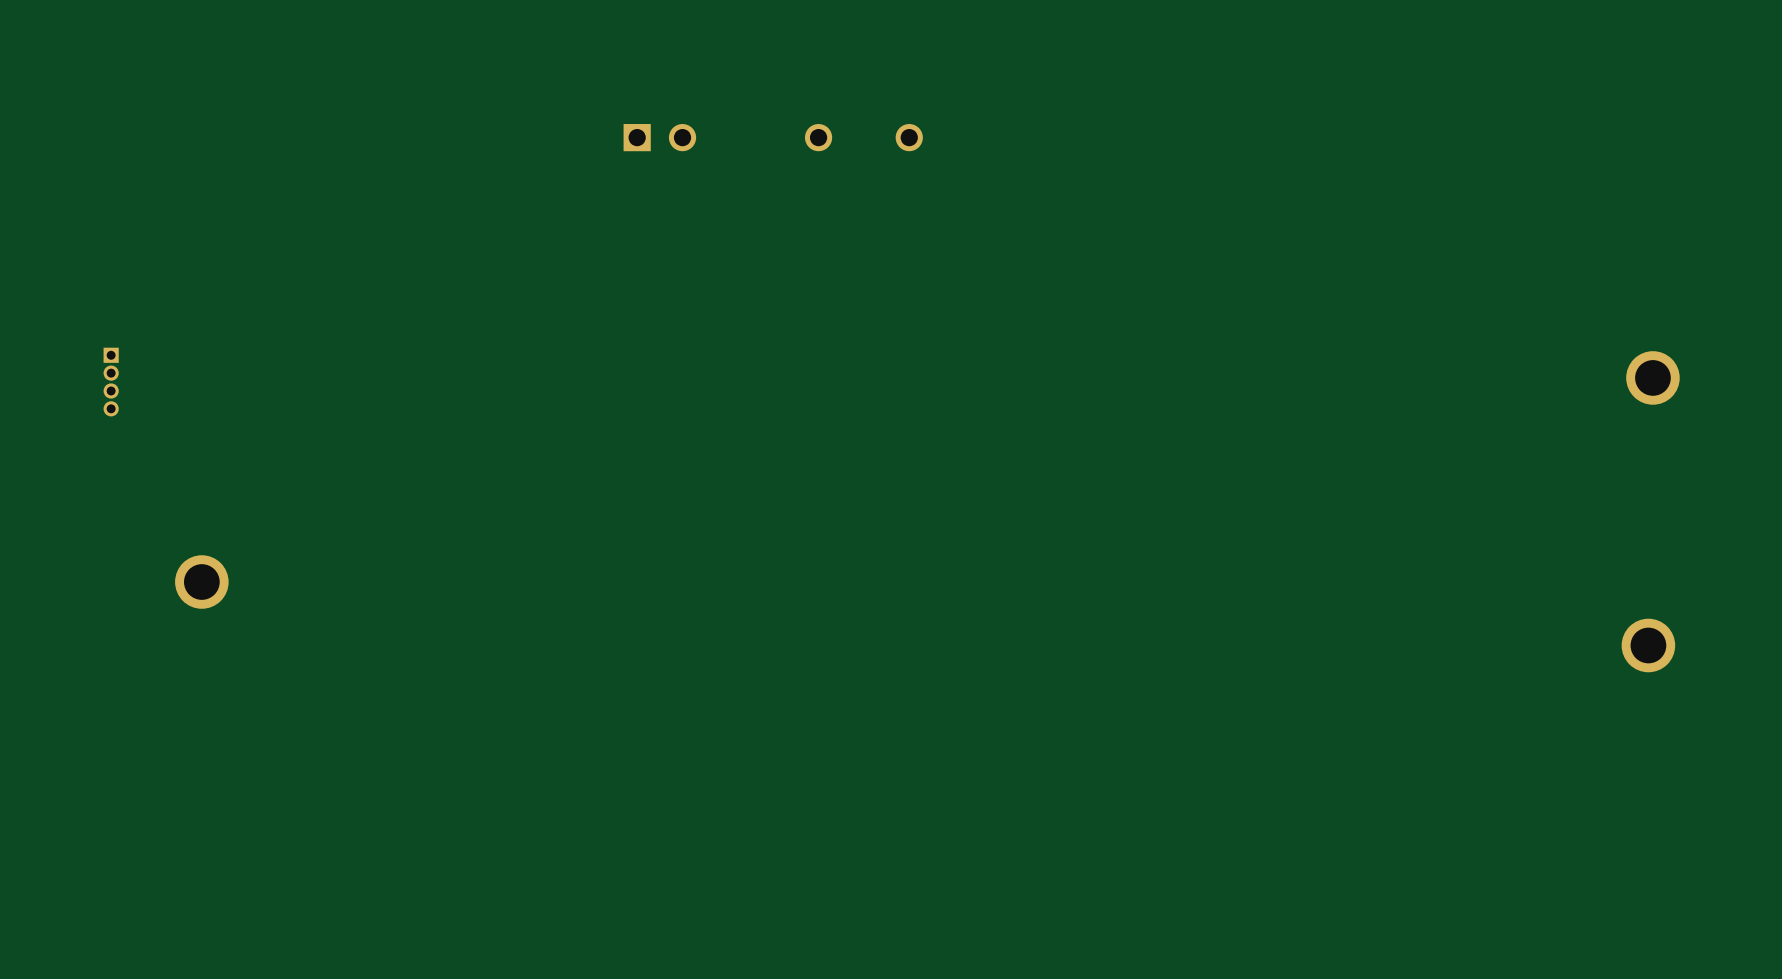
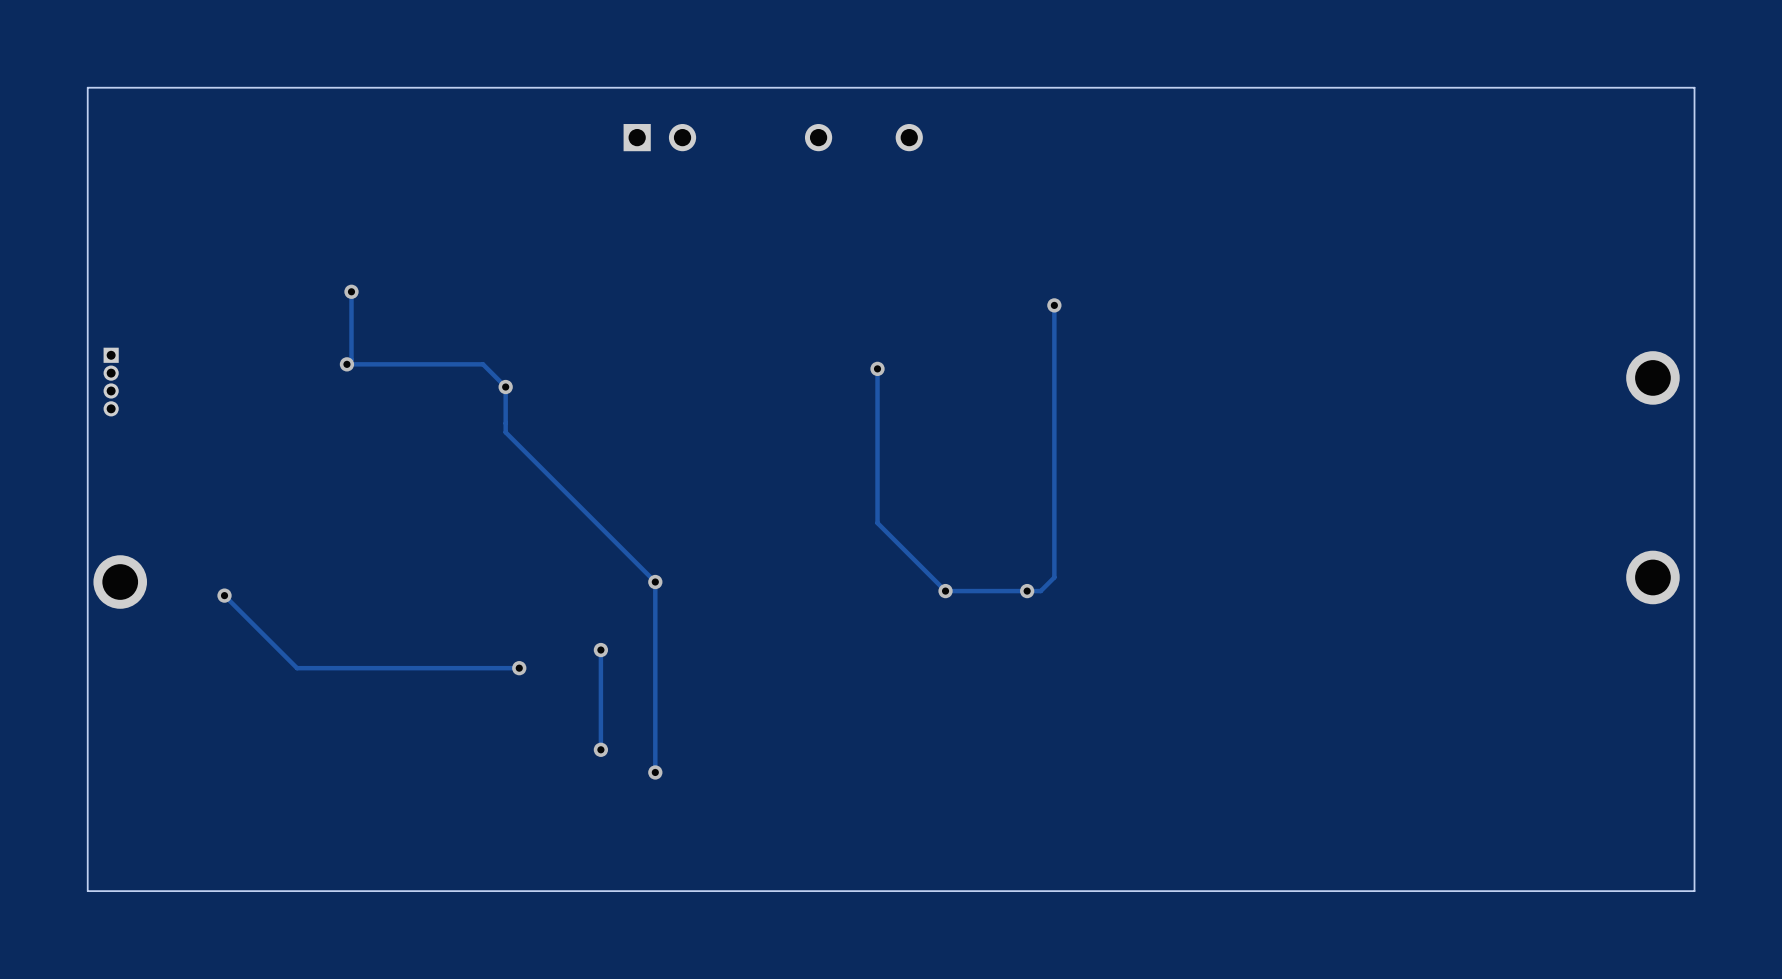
board edge: none -> (1694, 87) (87, 87) (87, 891) (1694, 891) (1694, 87)
track: none -> (351, 291) (351, 359) (346, 364) (483, 364) (505, 387) (505, 432) (655, 582) (655, 772)
via: none -> (351, 291)
track: none -> (1054, 305) (1054, 577) (1040, 591) (945, 591) (877, 523) (877, 368)
via: none -> (1054, 305)
via: none -> (346, 364)
via: none -> (877, 368)
via: none -> (505, 387)
part position: (201, 582) -> (120, 582)
via: none -> (655, 582)
via: none -> (945, 591)
via: none -> (1027, 591)
track: none -> (224, 595) (297, 668) (519, 668)
via: none -> (224, 595)
part position: (1648, 645) -> (1652, 577)
track: none -> (600, 650) (600, 749)
via: none -> (600, 650)
via: none -> (519, 668)
via: none -> (600, 749)
via: none -> (655, 772)

